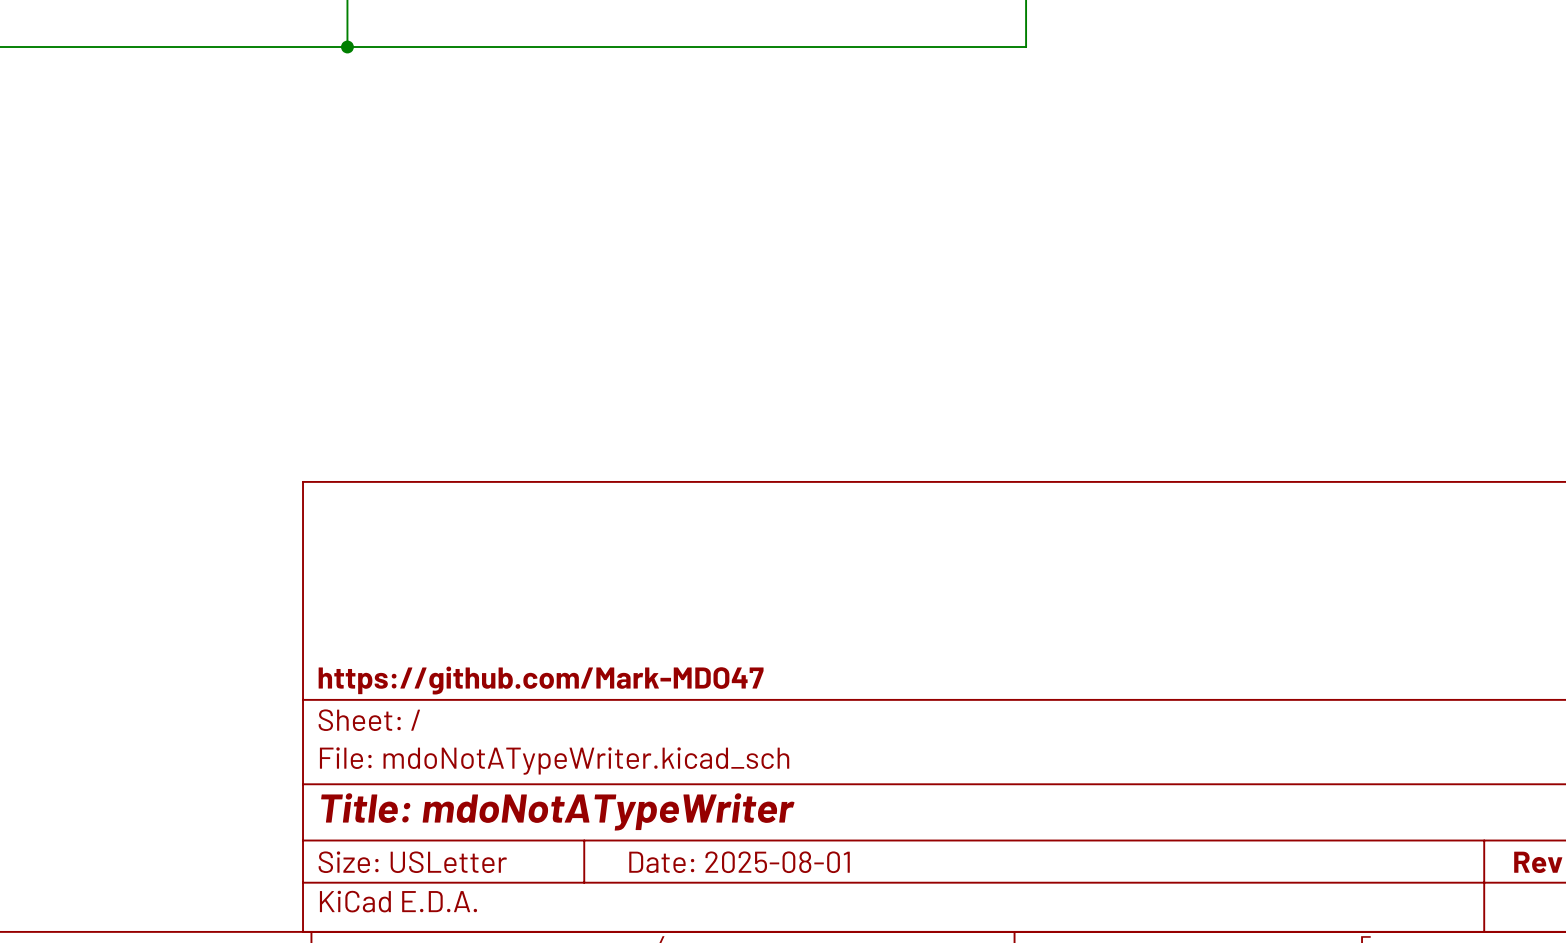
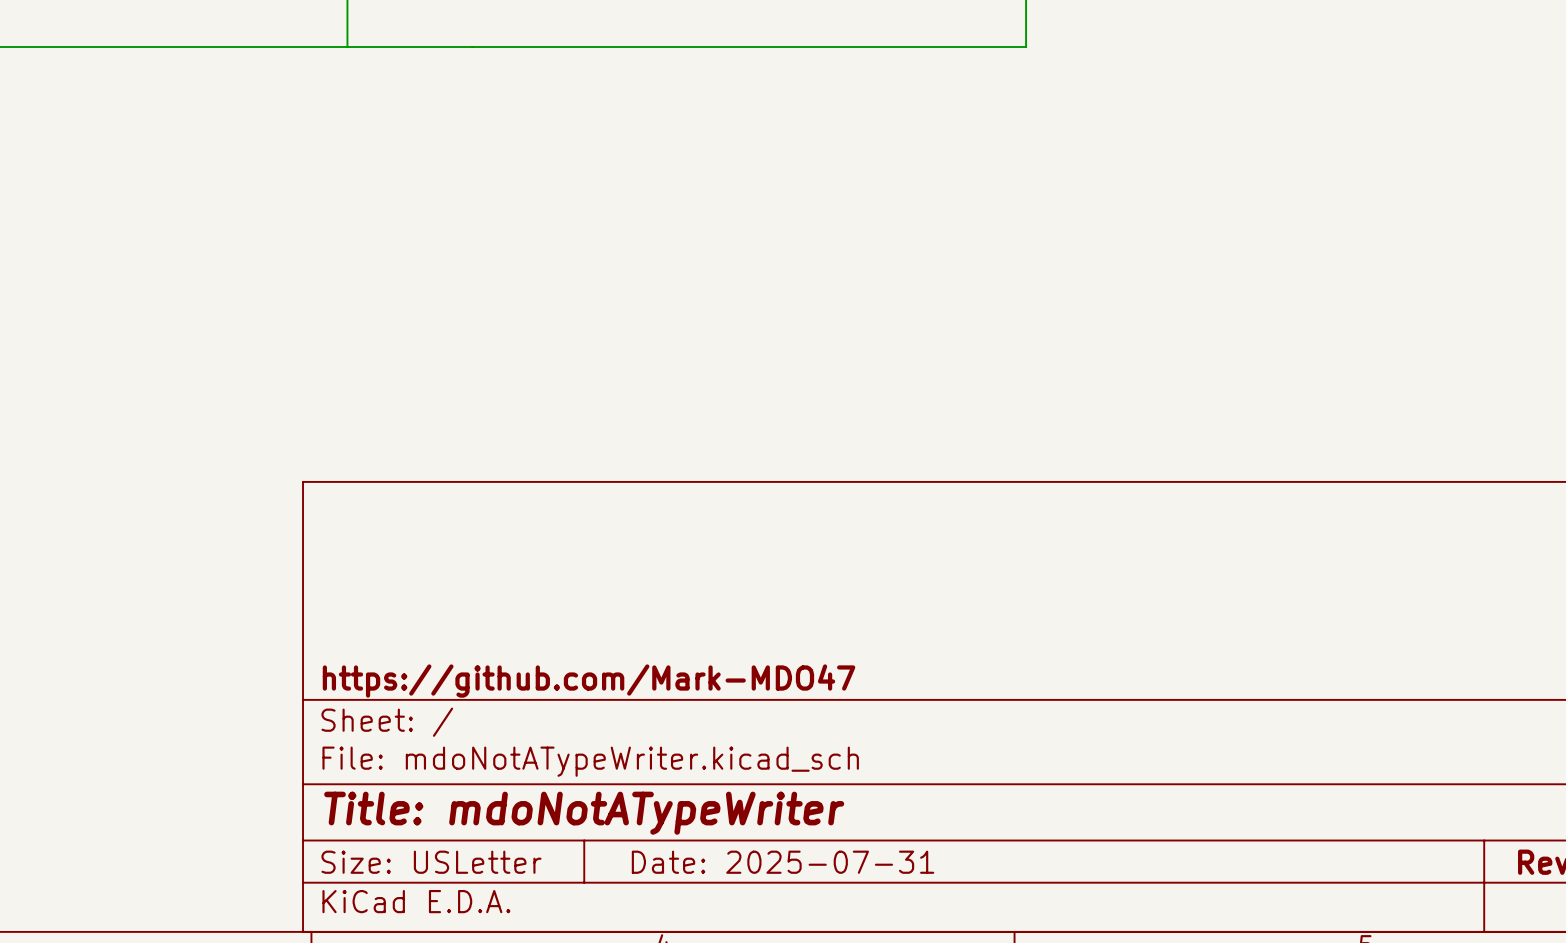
junction: (347, 47) -> none
title block: Date: 2025-08-01 (739, 862) -> Date: 2025-07-31 (783, 862)

